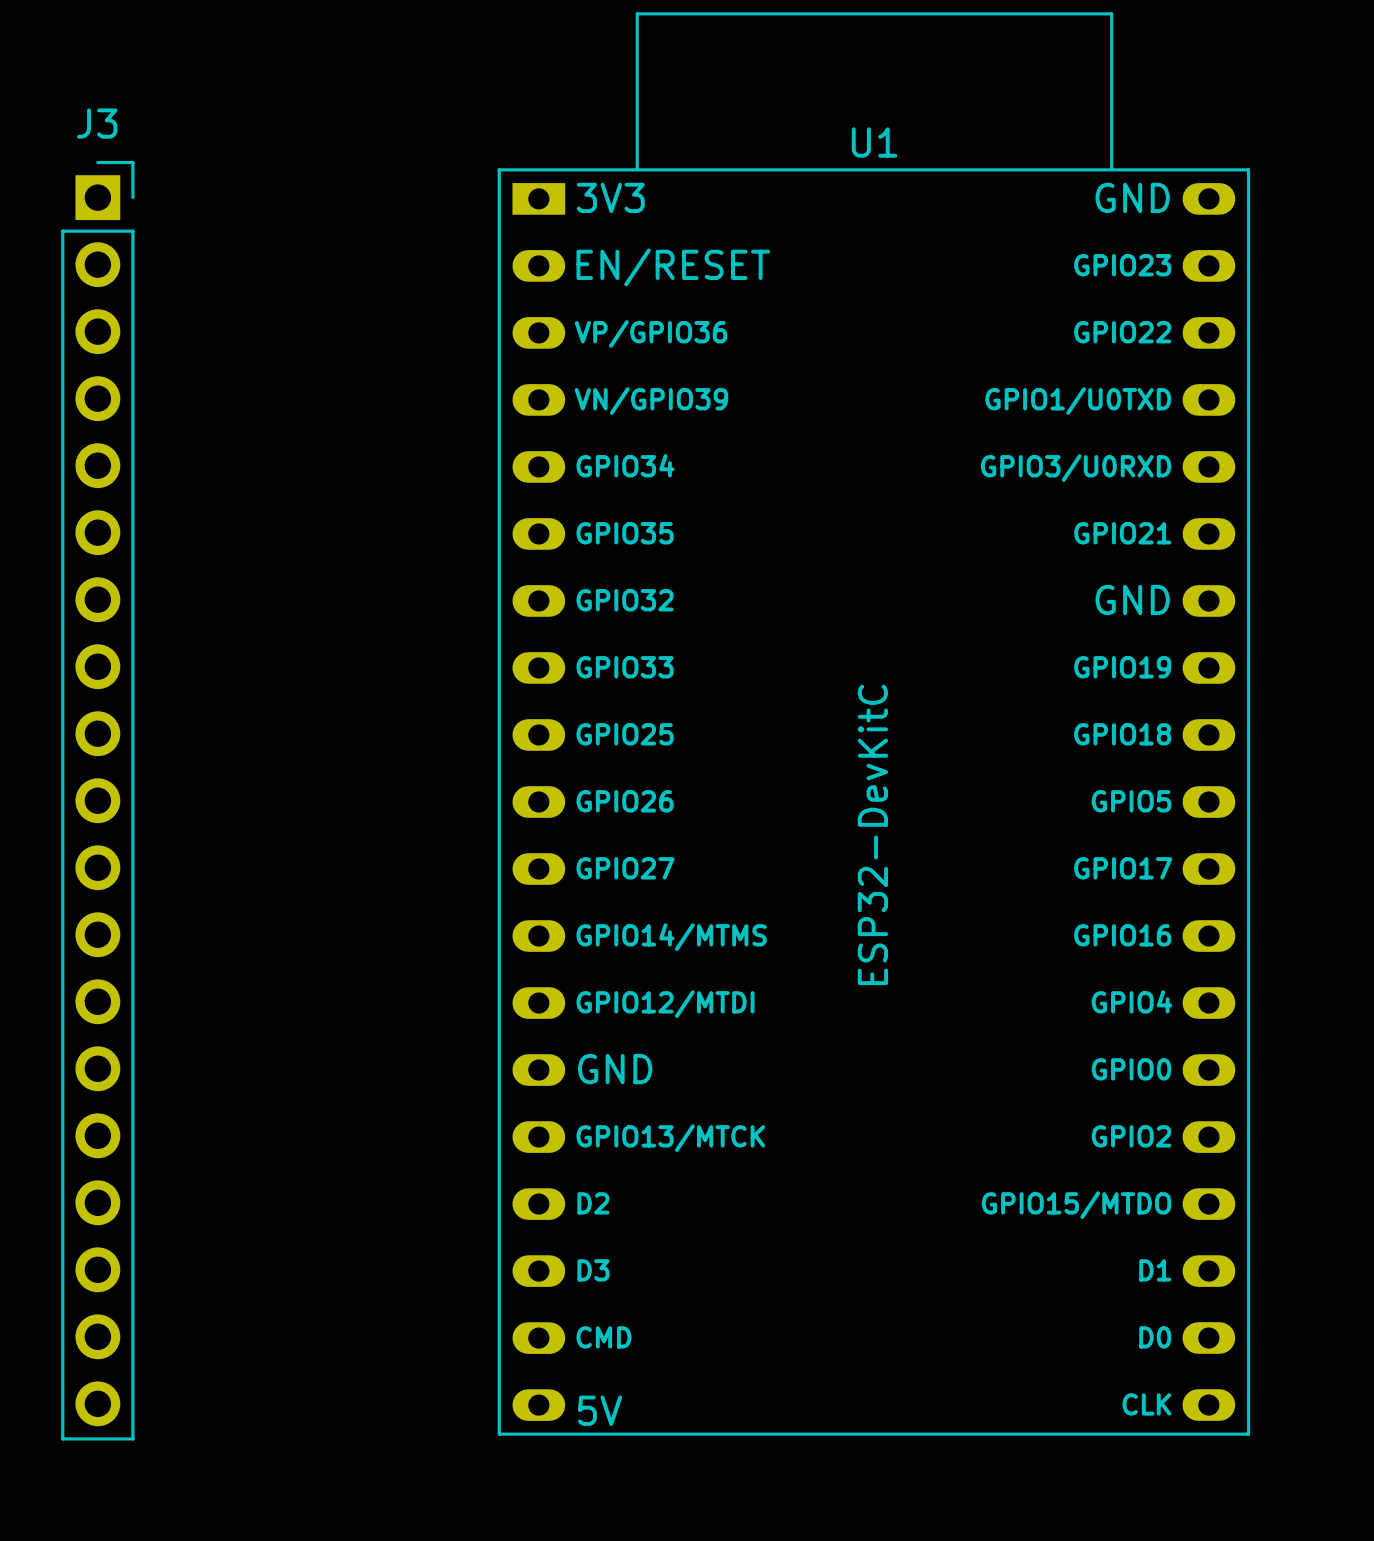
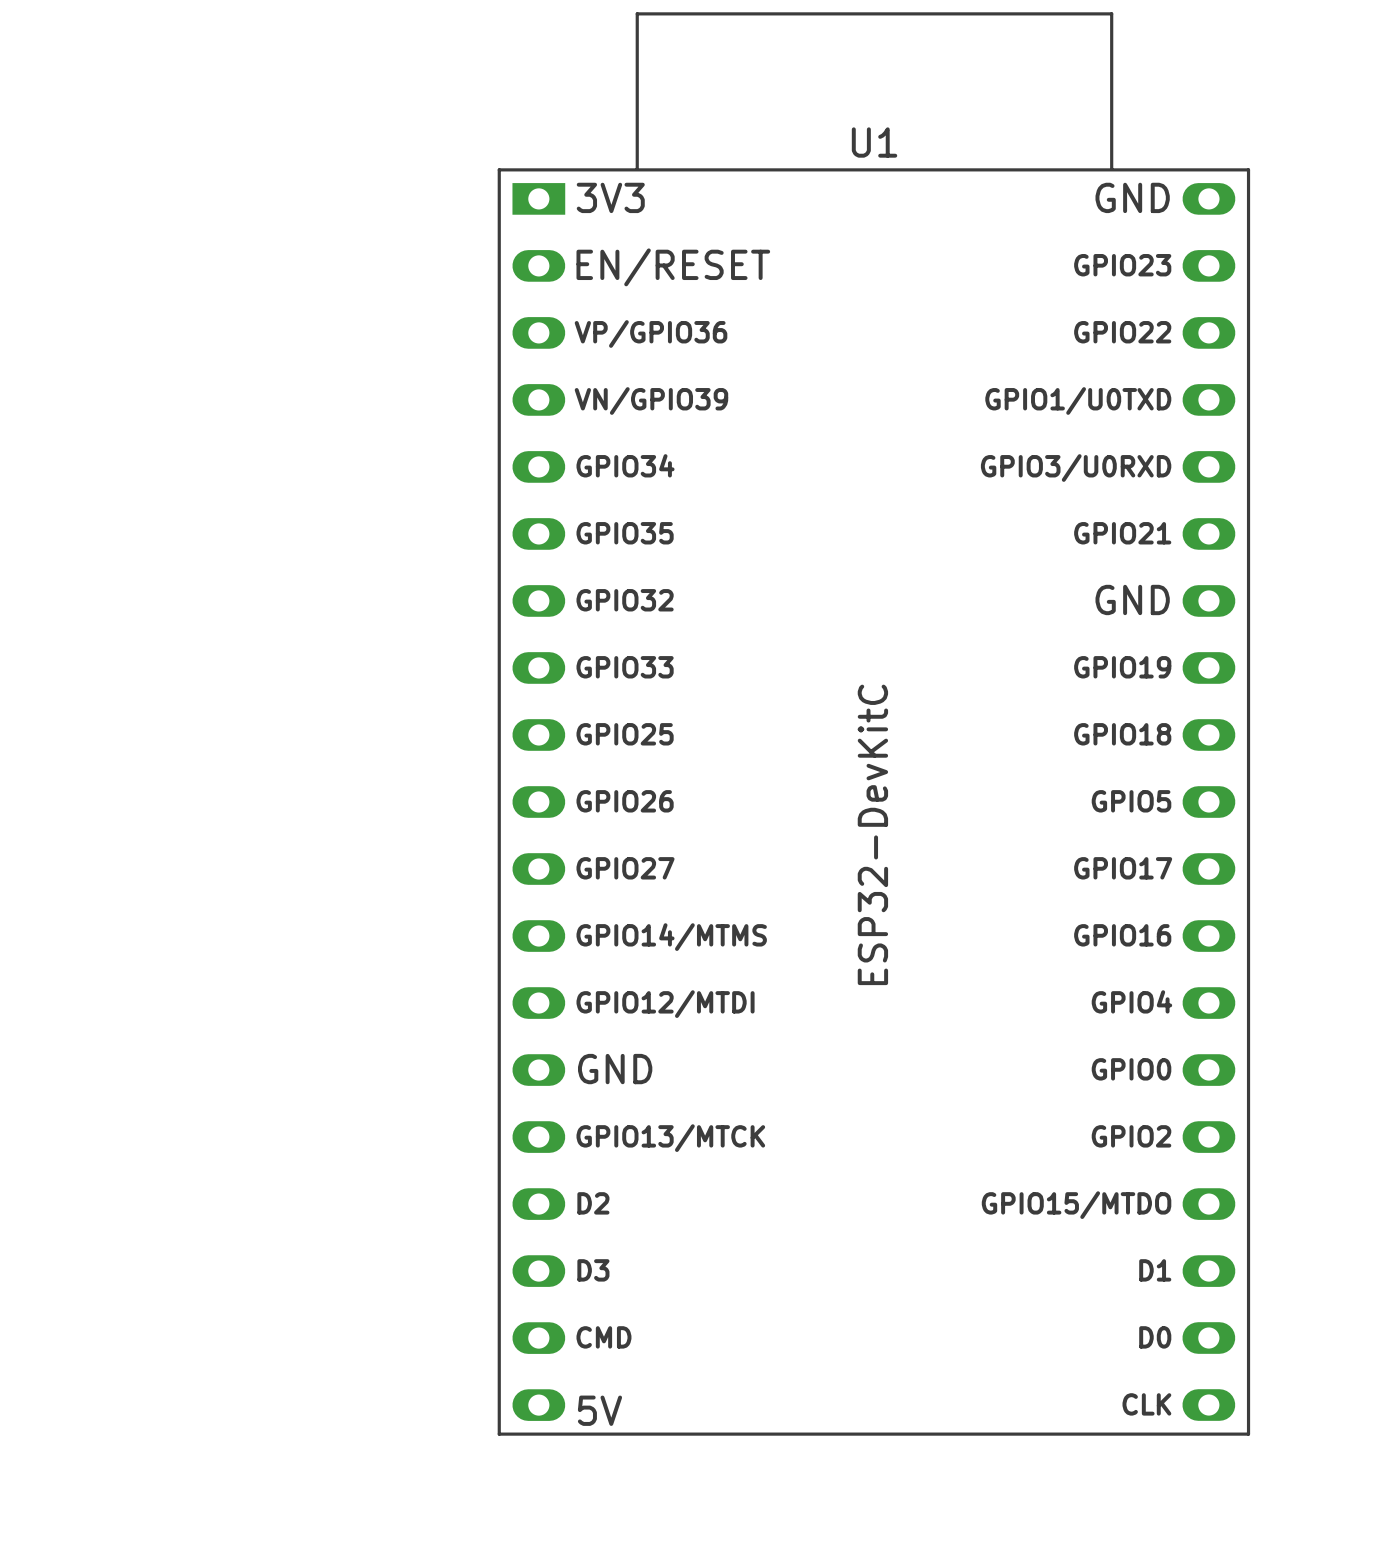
J3: (97, 800) -> none

